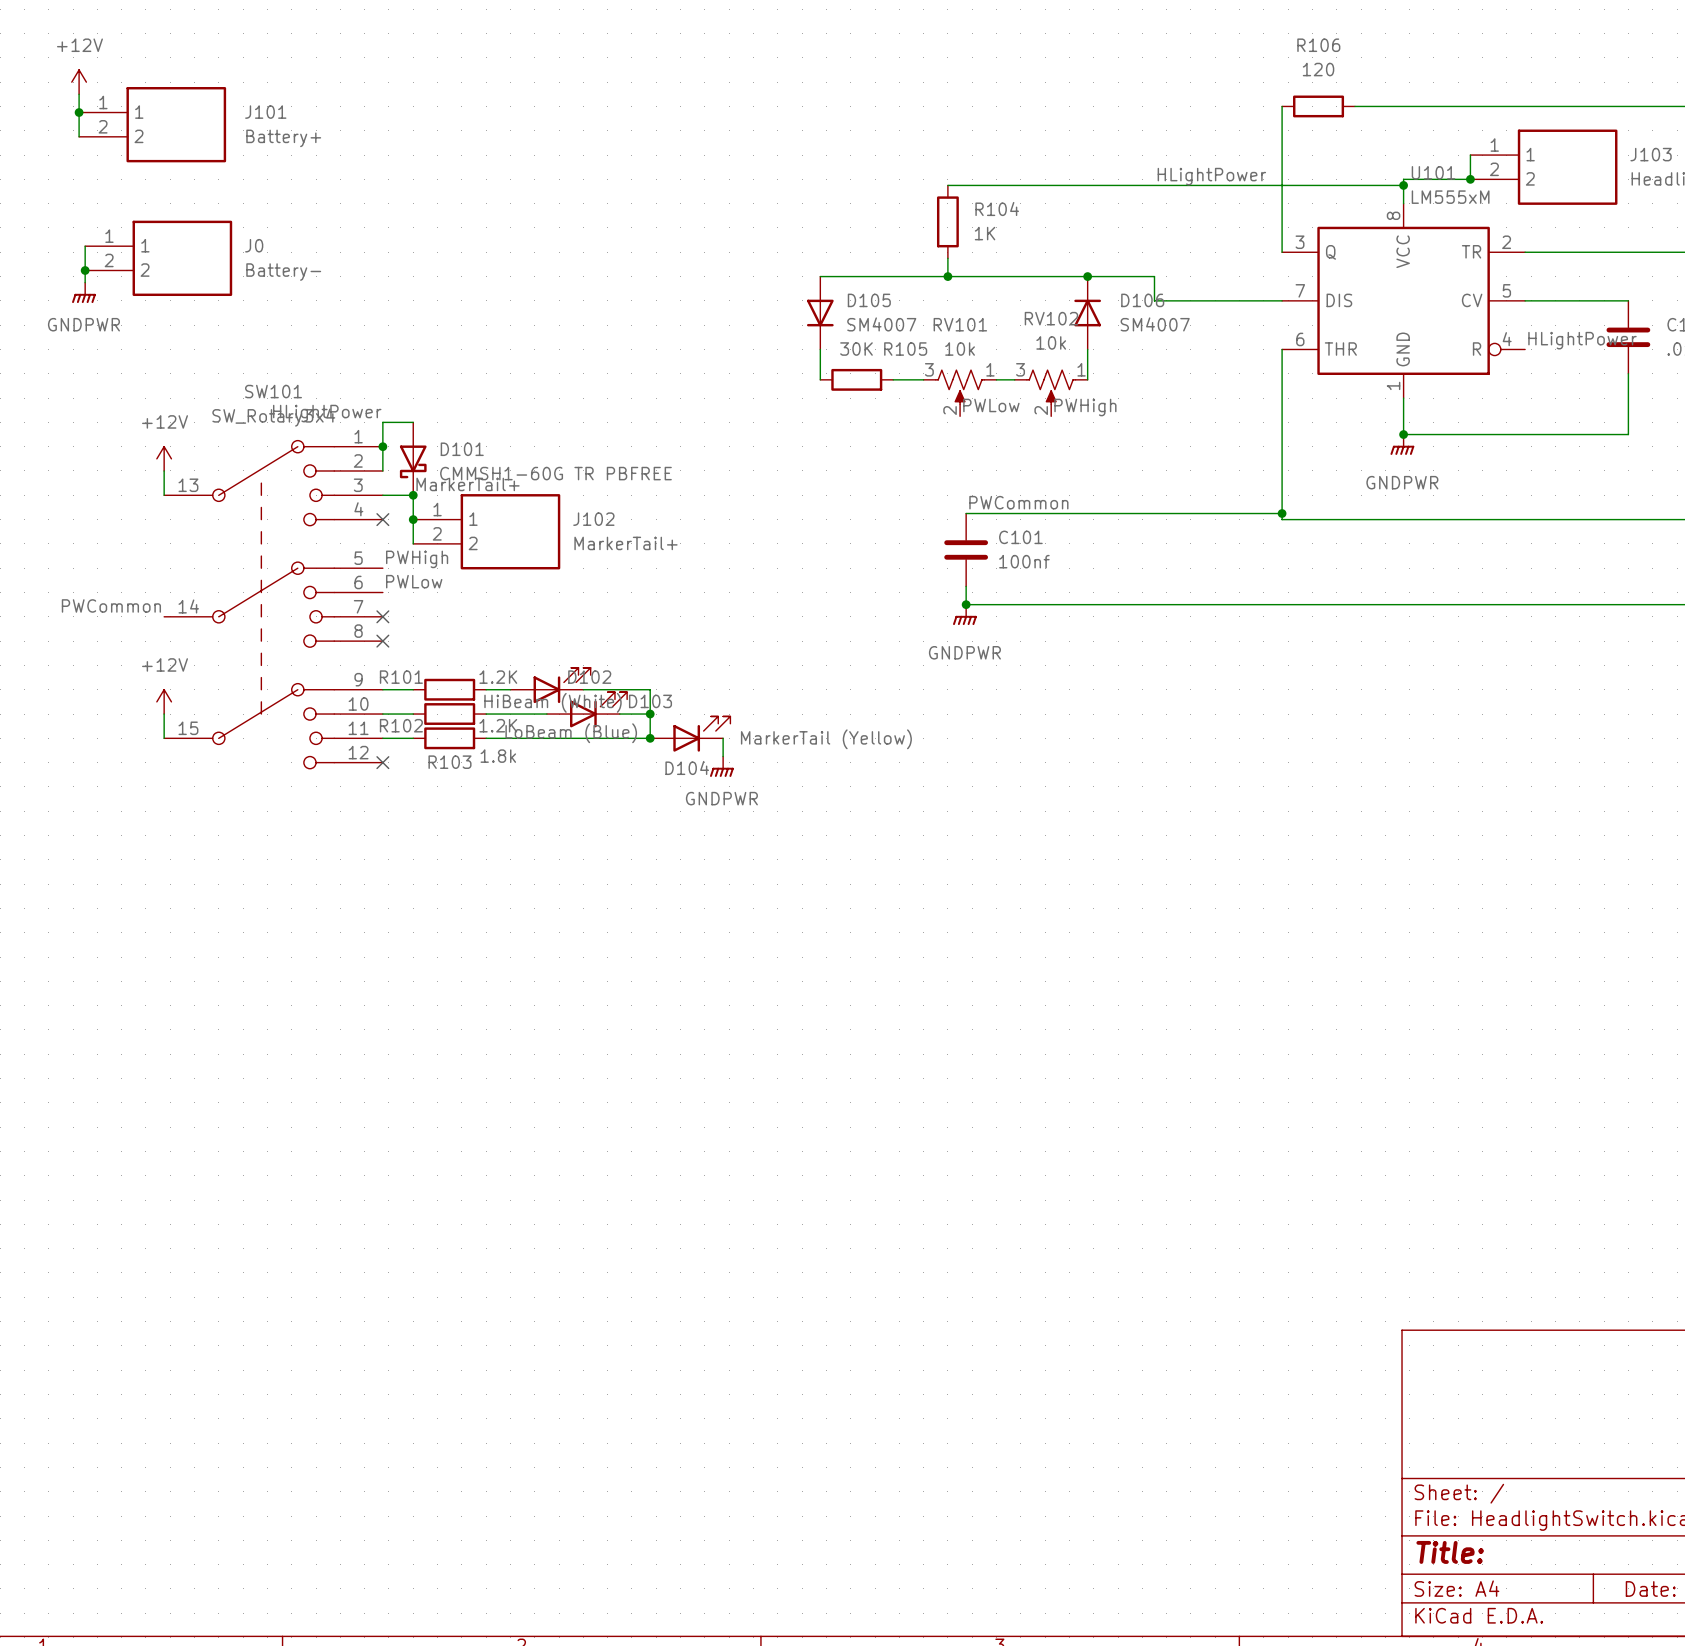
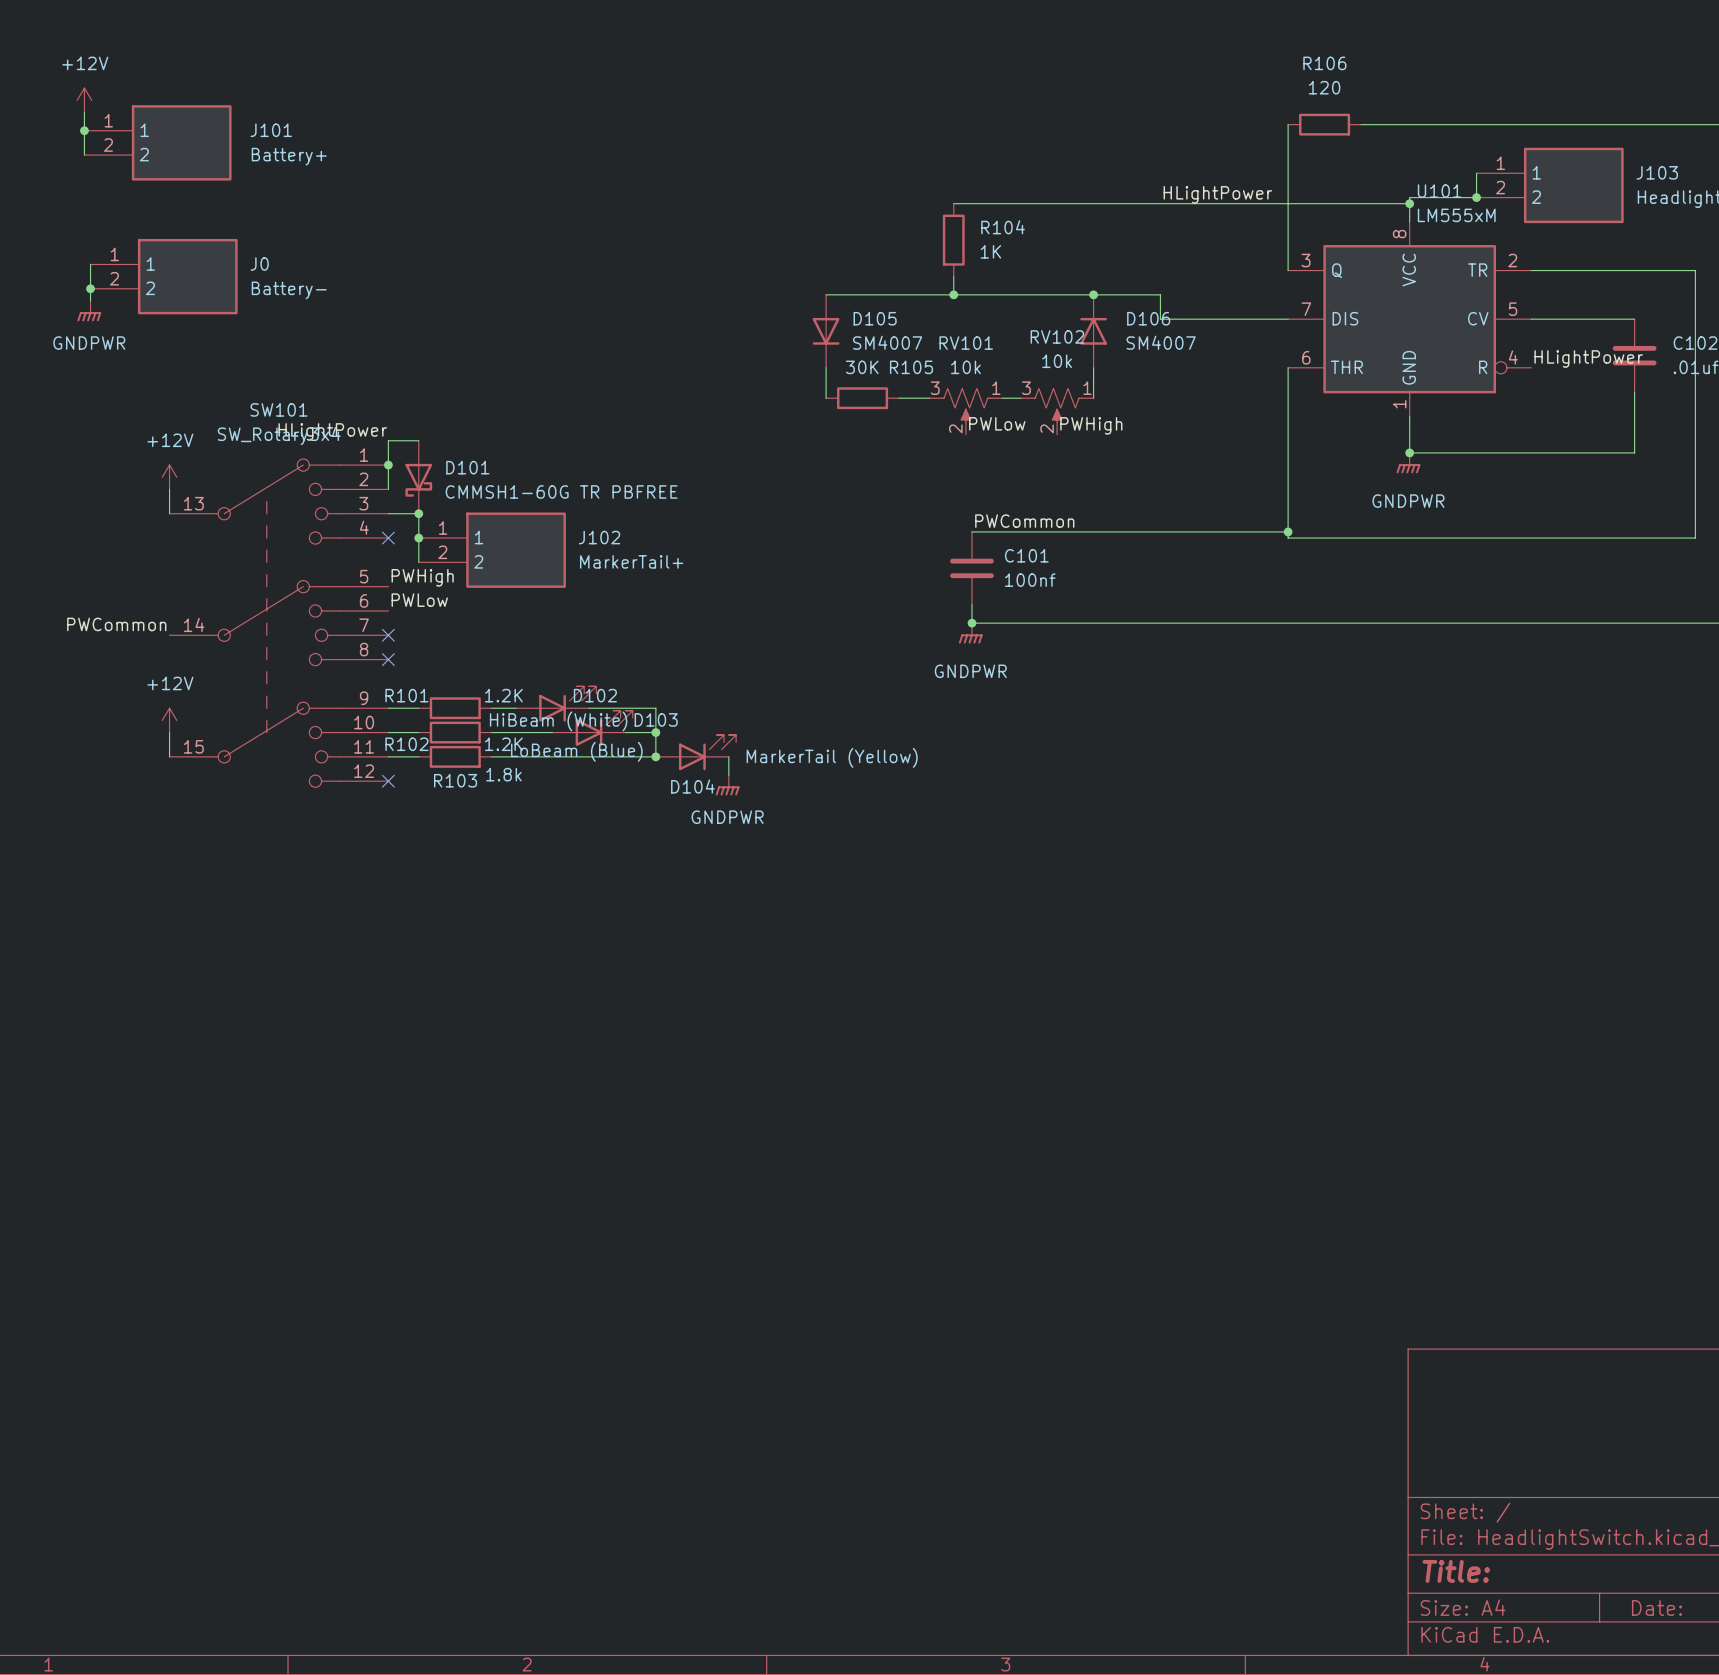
label: MarkerTail+ (468, 484) -> none

